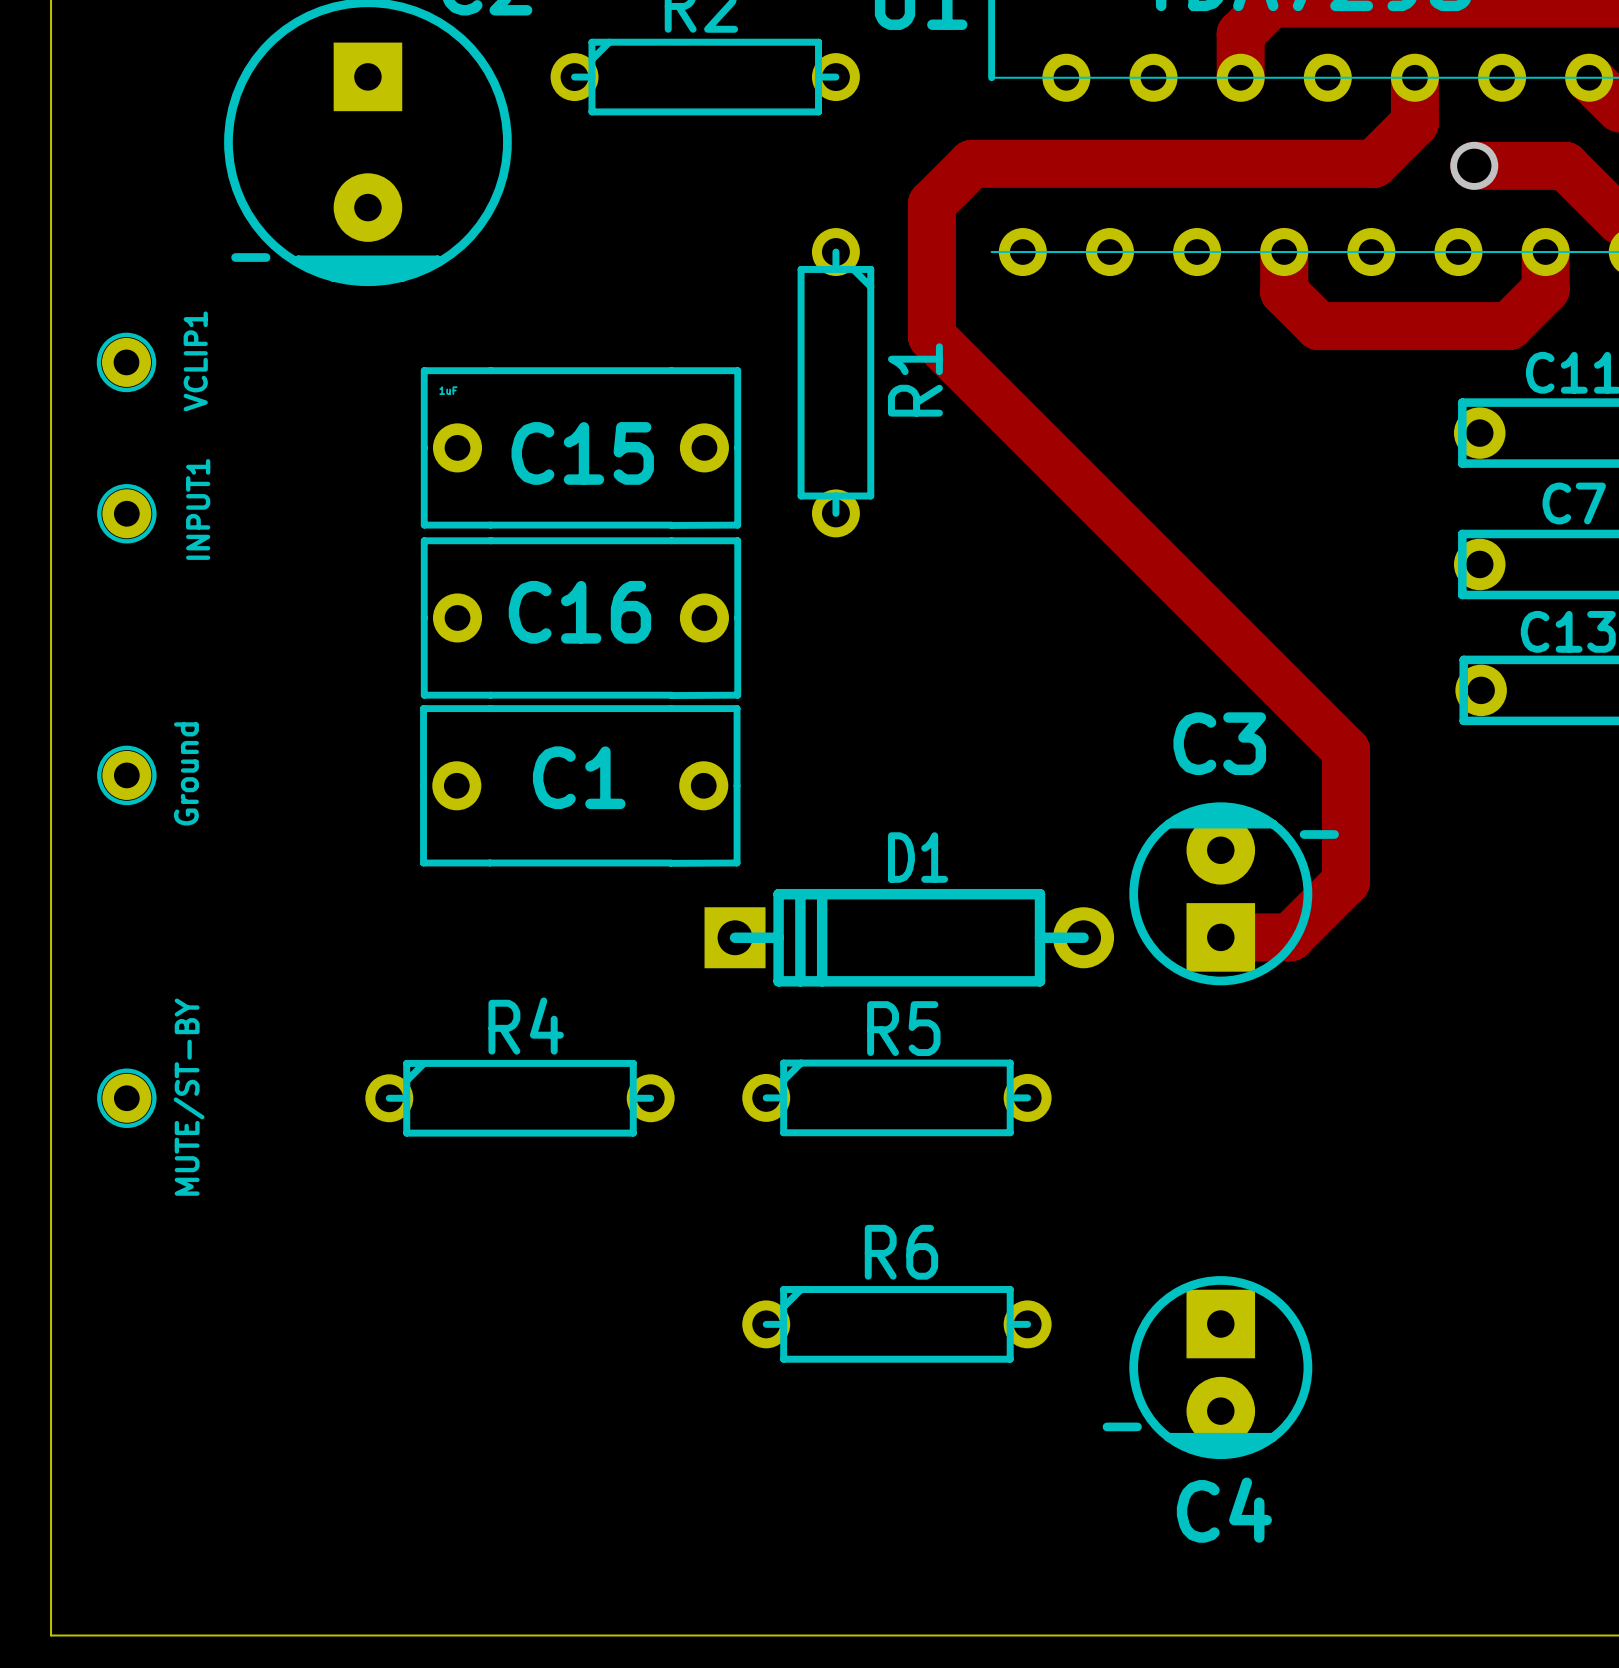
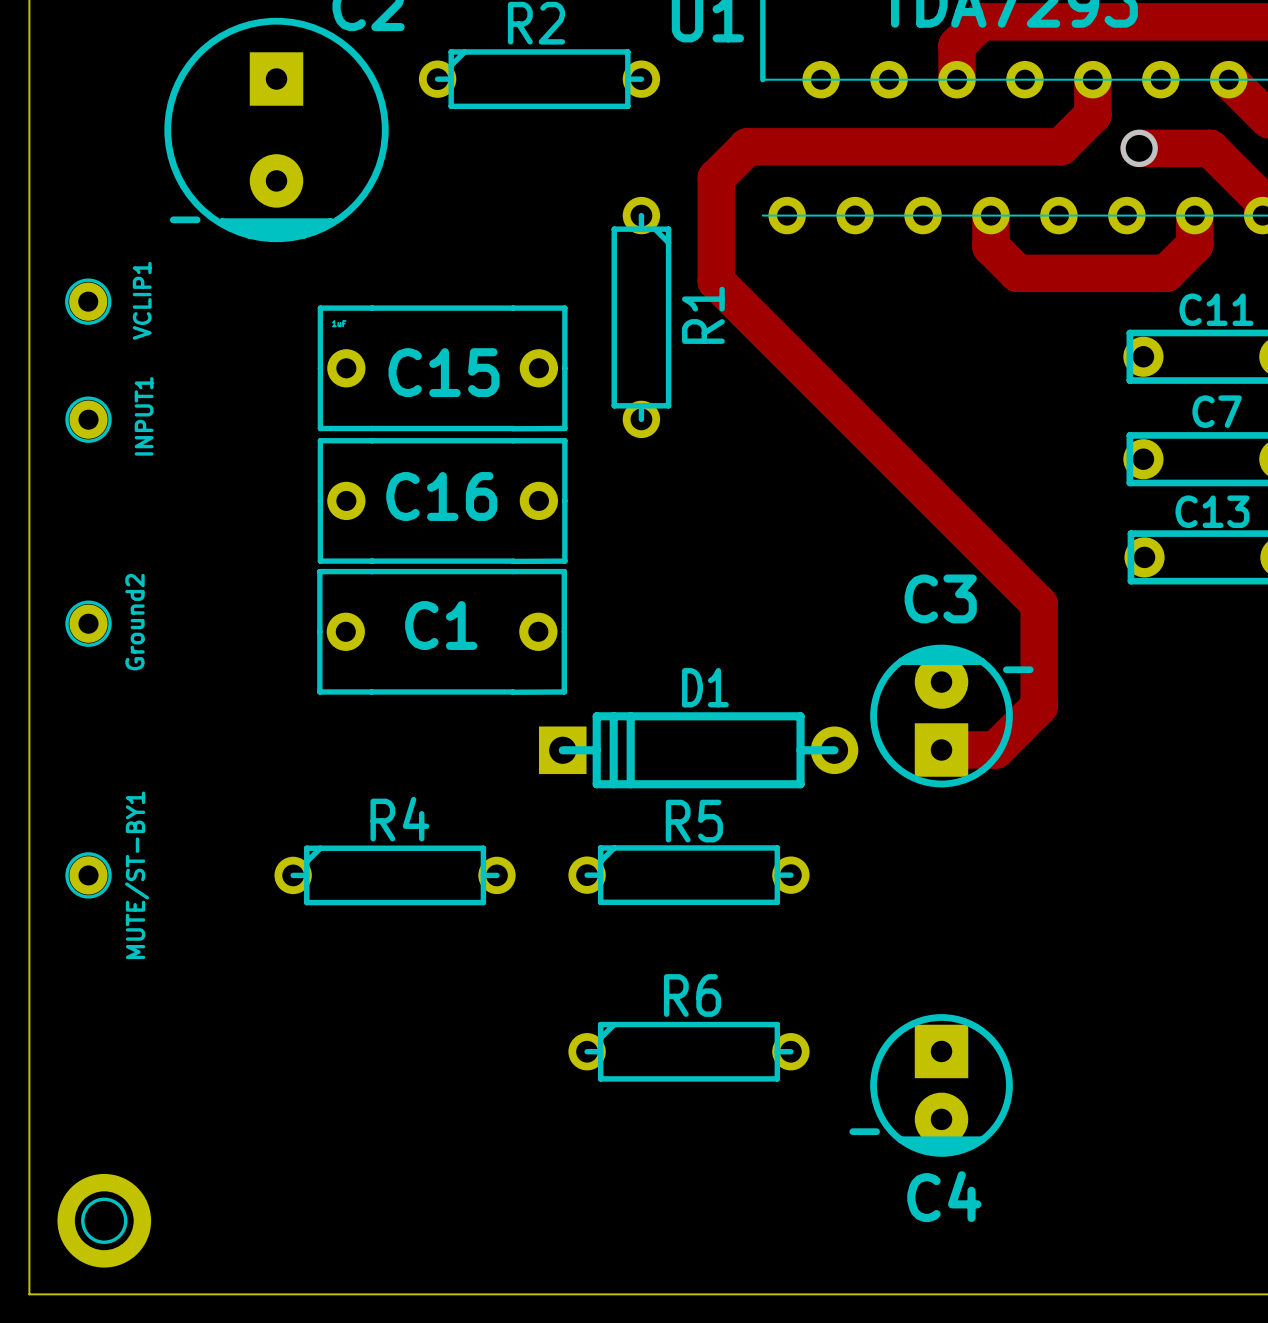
Ground name: Ground (186, 773) -> Ground2 (135, 622)
MUTE/ST-BY name: MUTE/ST-BY (189, 1097) -> MUTE/ST-BY1 (137, 875)
part: none -> (104, 1220)

